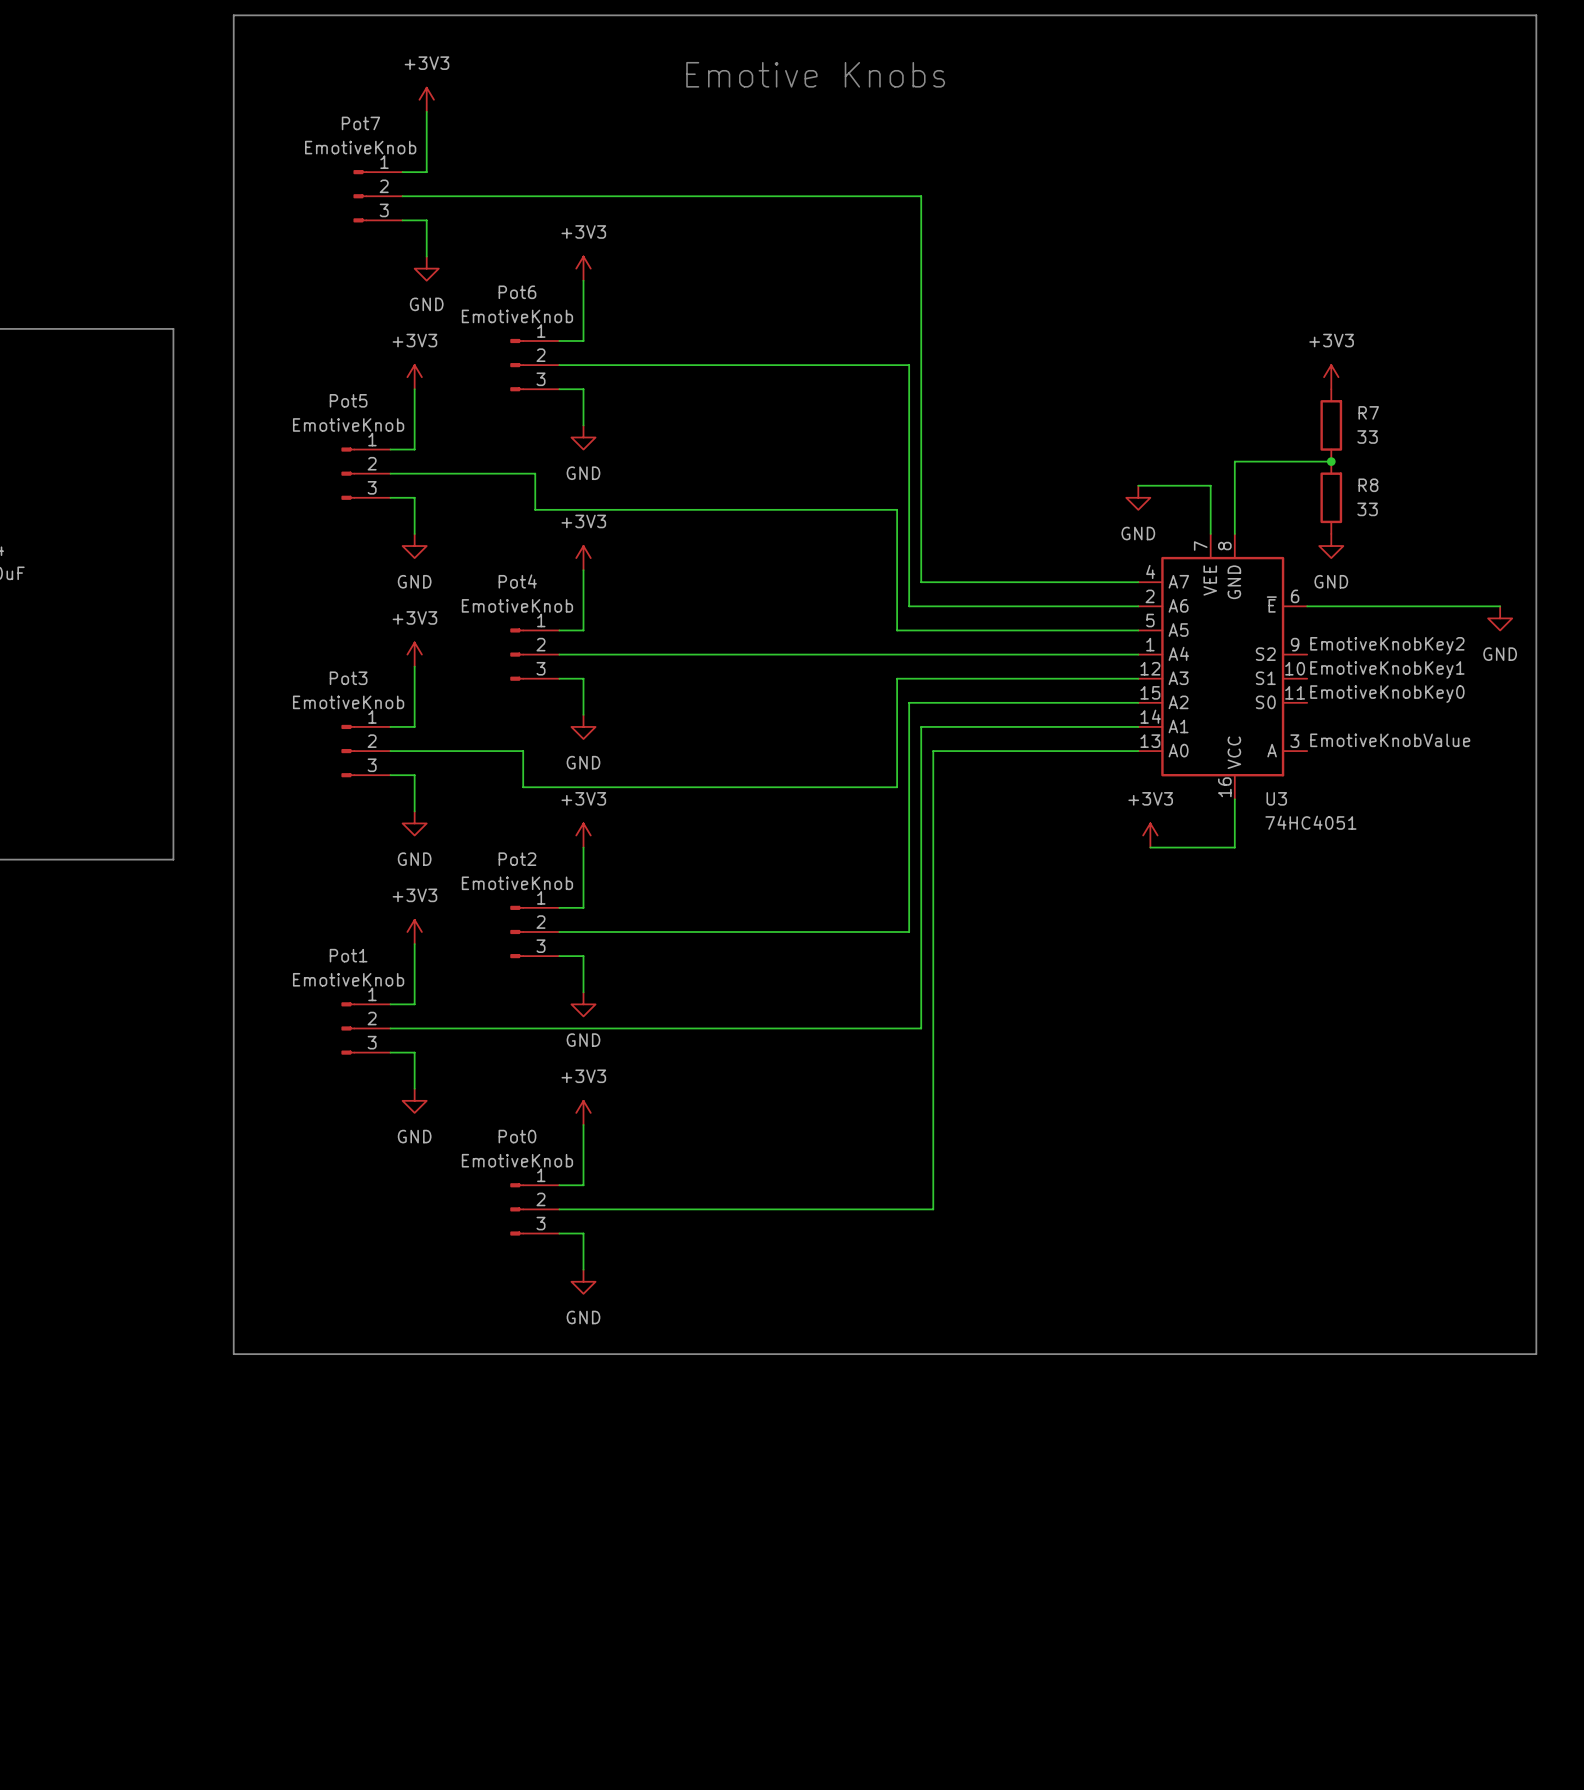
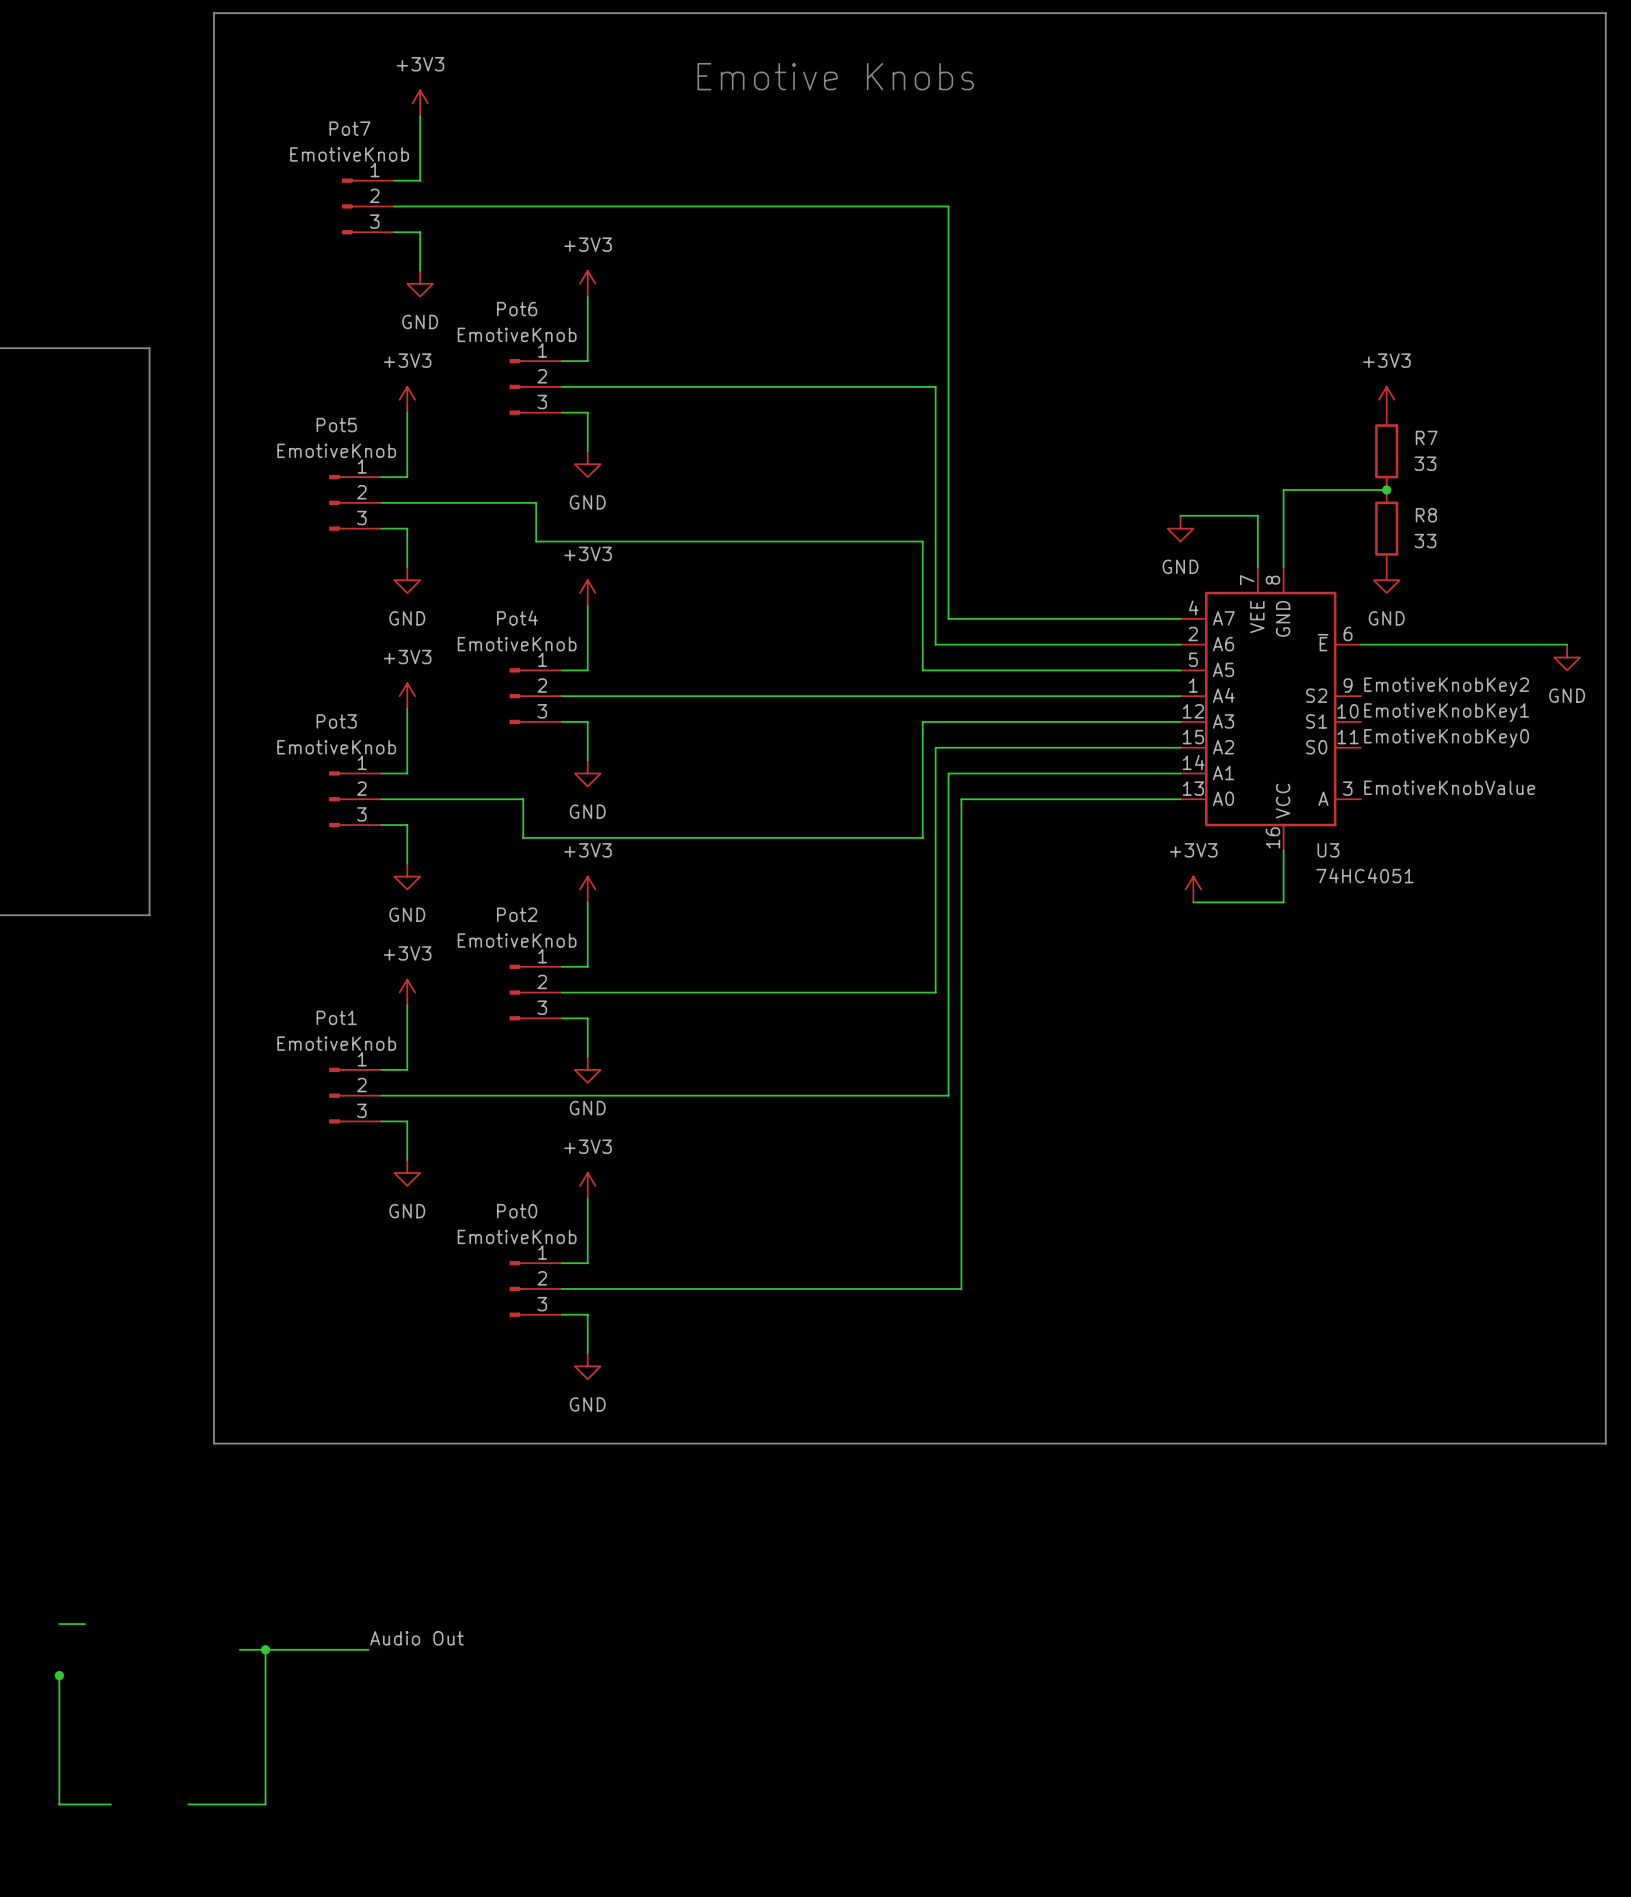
wire: none -> (59, 1624) (85, 1624)
label: none -> Audio Out (416, 1638)
wire: none -> (239, 1649) (368, 1649)
wire: none -> (265, 1649) (265, 1804) (188, 1804)
junction: none -> (265, 1649)
wire: none -> (59, 1675) (59, 1804) (110, 1804)
junction: none -> (59, 1675)

